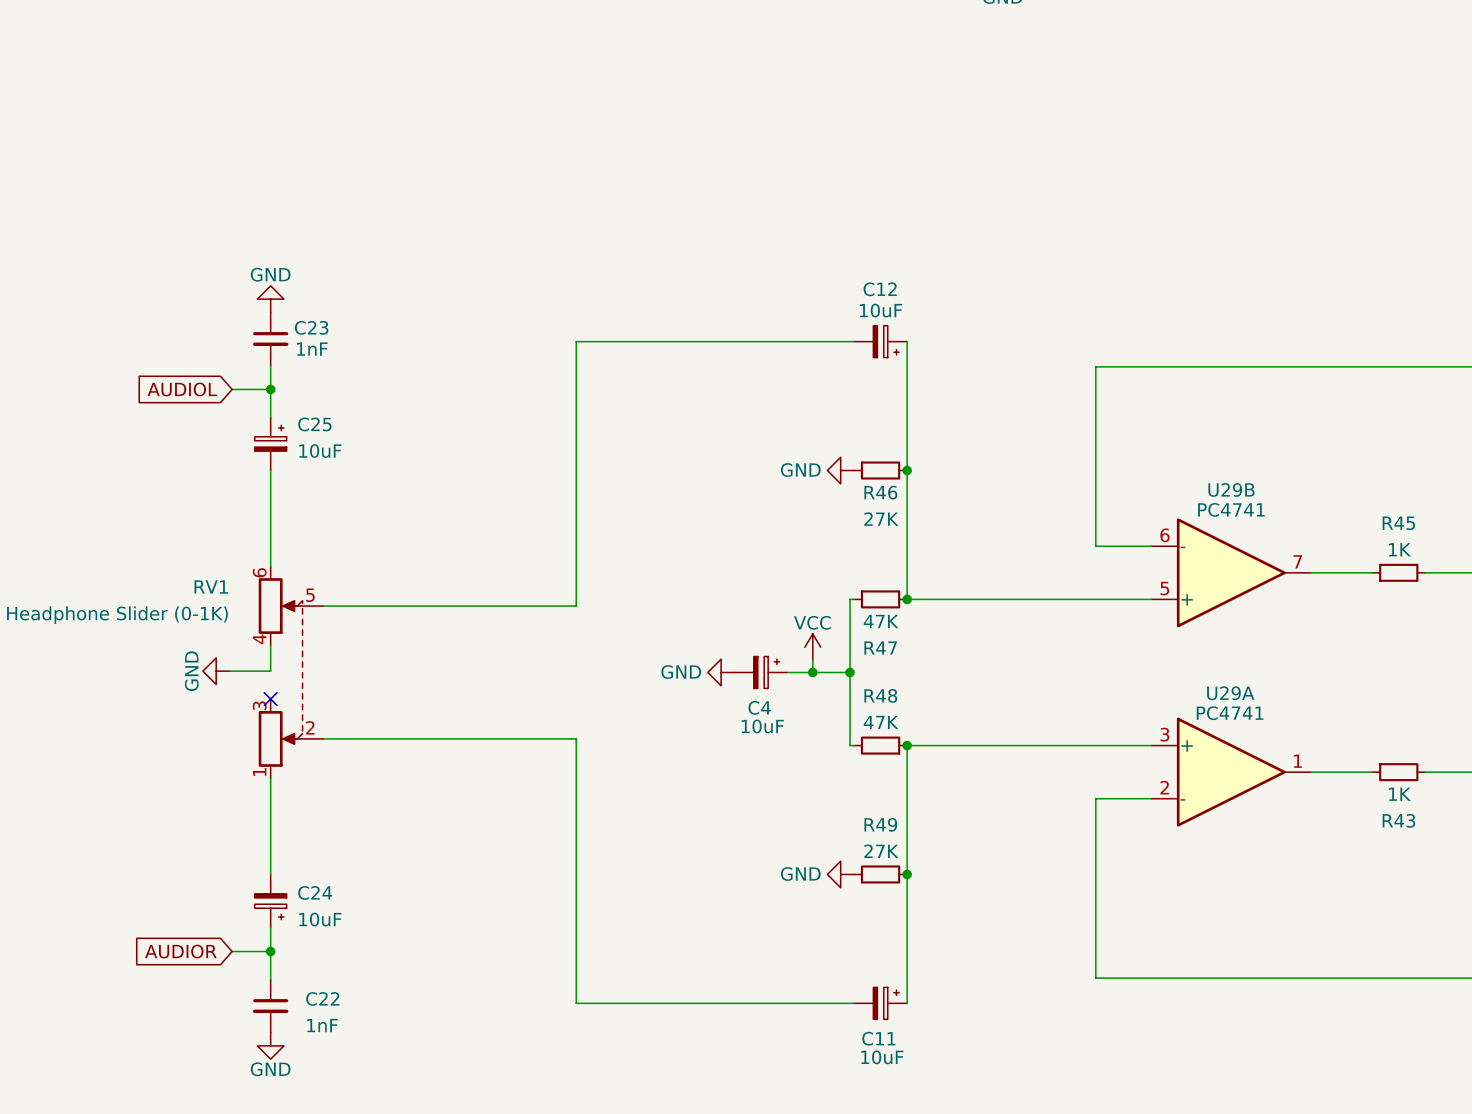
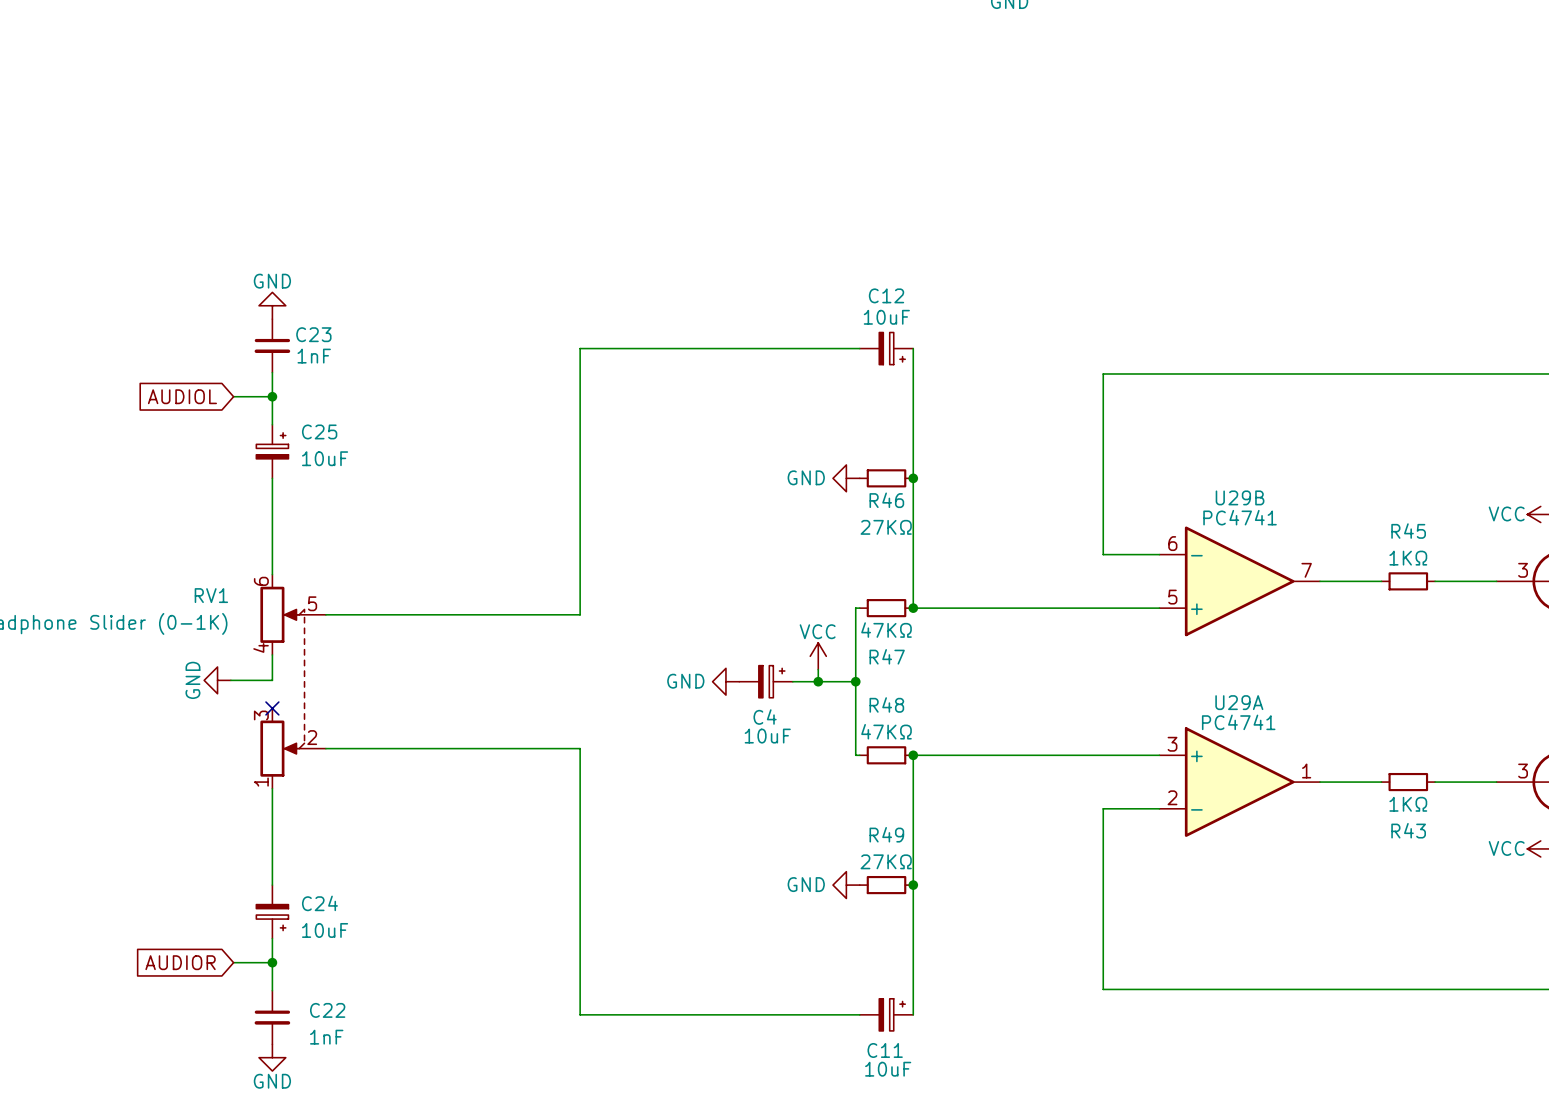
R46 value: 27K (881, 519) -> 27KΩ (886, 527)
R45 value: 1K (1399, 549) -> 1KΩ (1408, 558)
R47 value: 47K (881, 621) -> 47KΩ (886, 630)
R48 value: 47K (881, 722) -> 47KΩ (886, 731)
R43 value: 1K (1399, 794) -> 1KΩ (1408, 804)
R49 value: 27K (881, 851) -> 27KΩ (886, 861)

